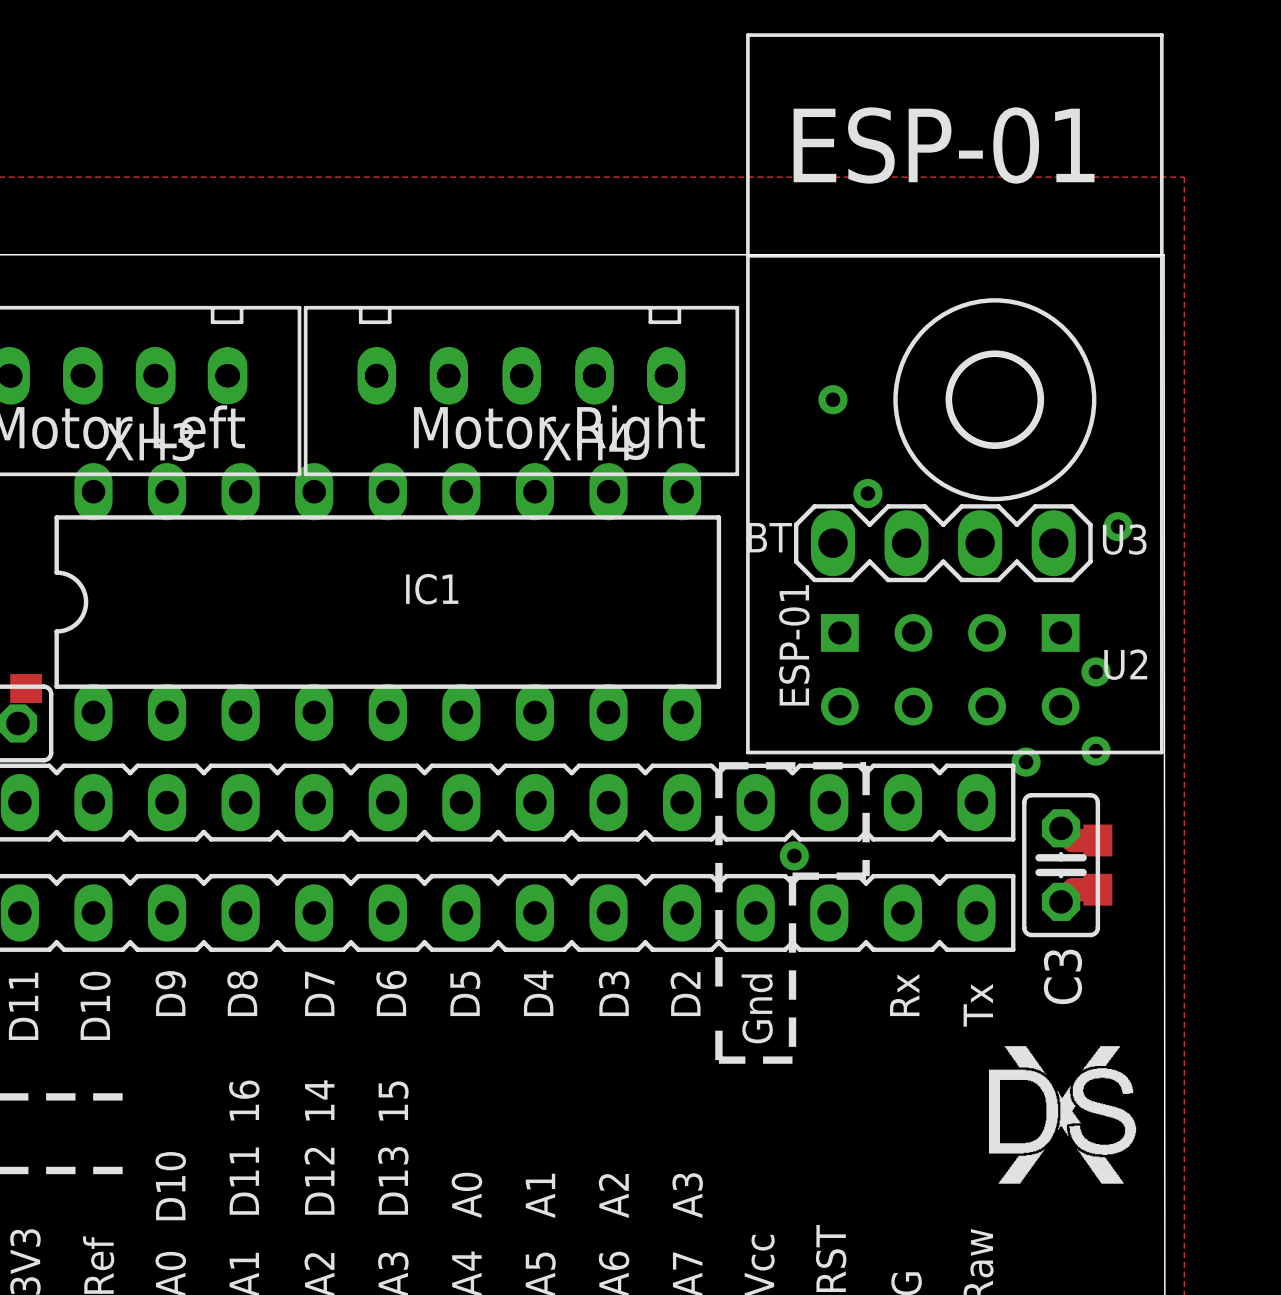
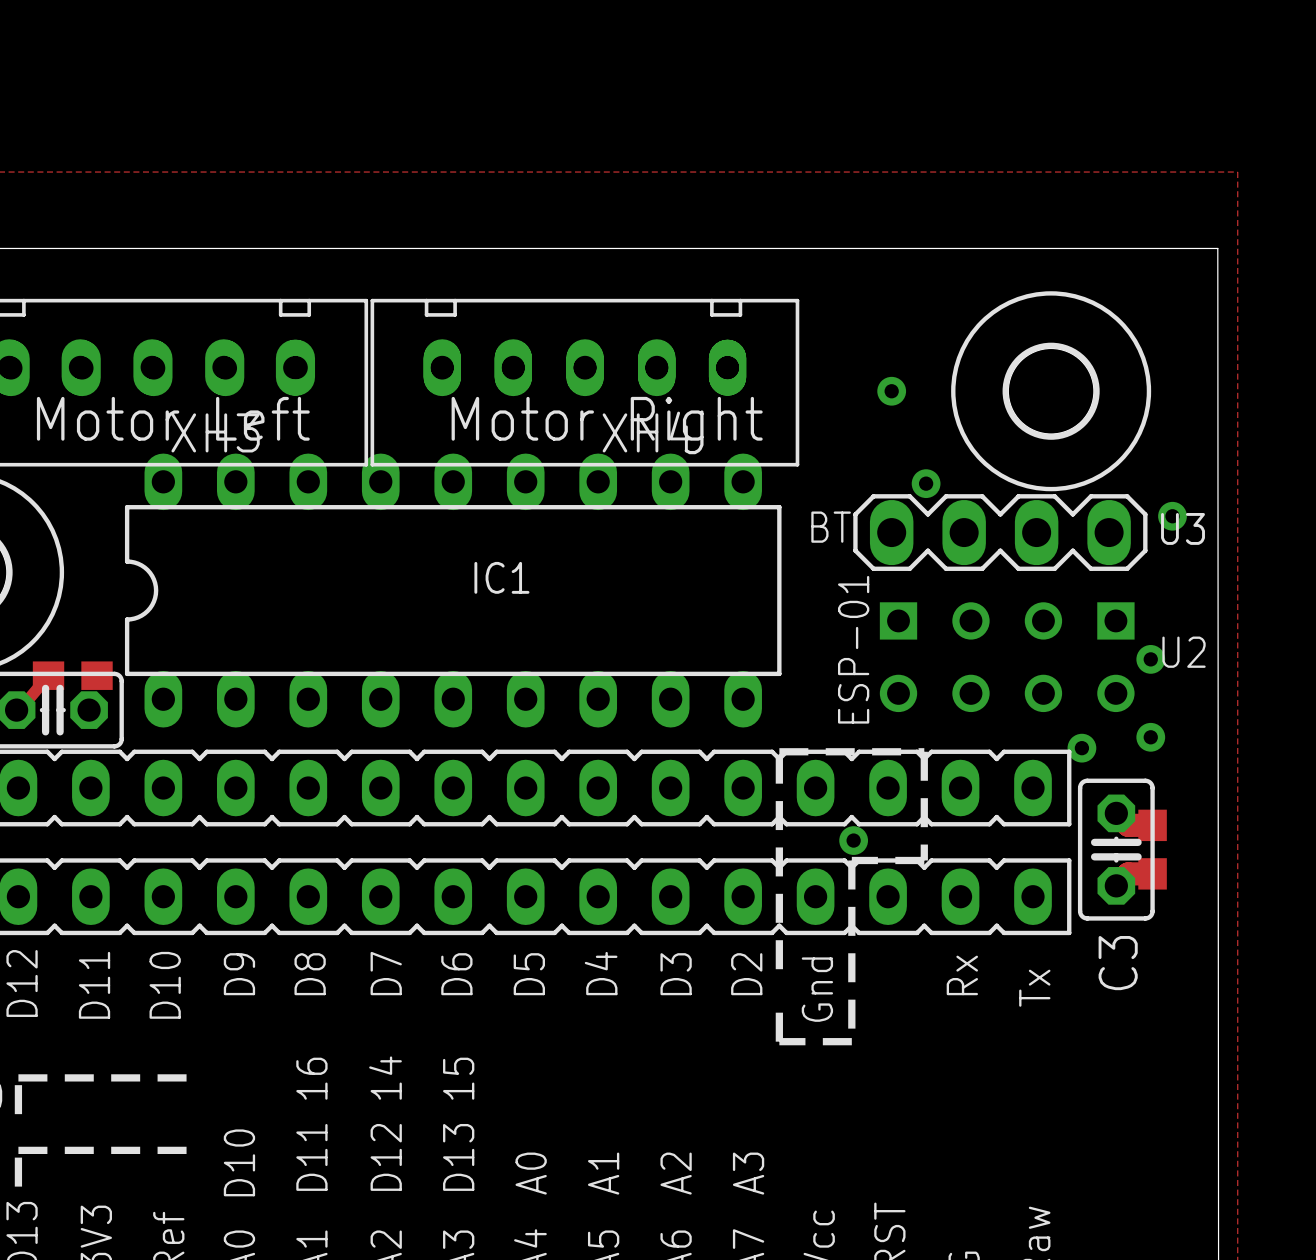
U2 footprint: [746, 33, 1164, 755] -> [879, 602, 1135, 713]
drawing: [988, 1046, 1137, 1184] -> none

